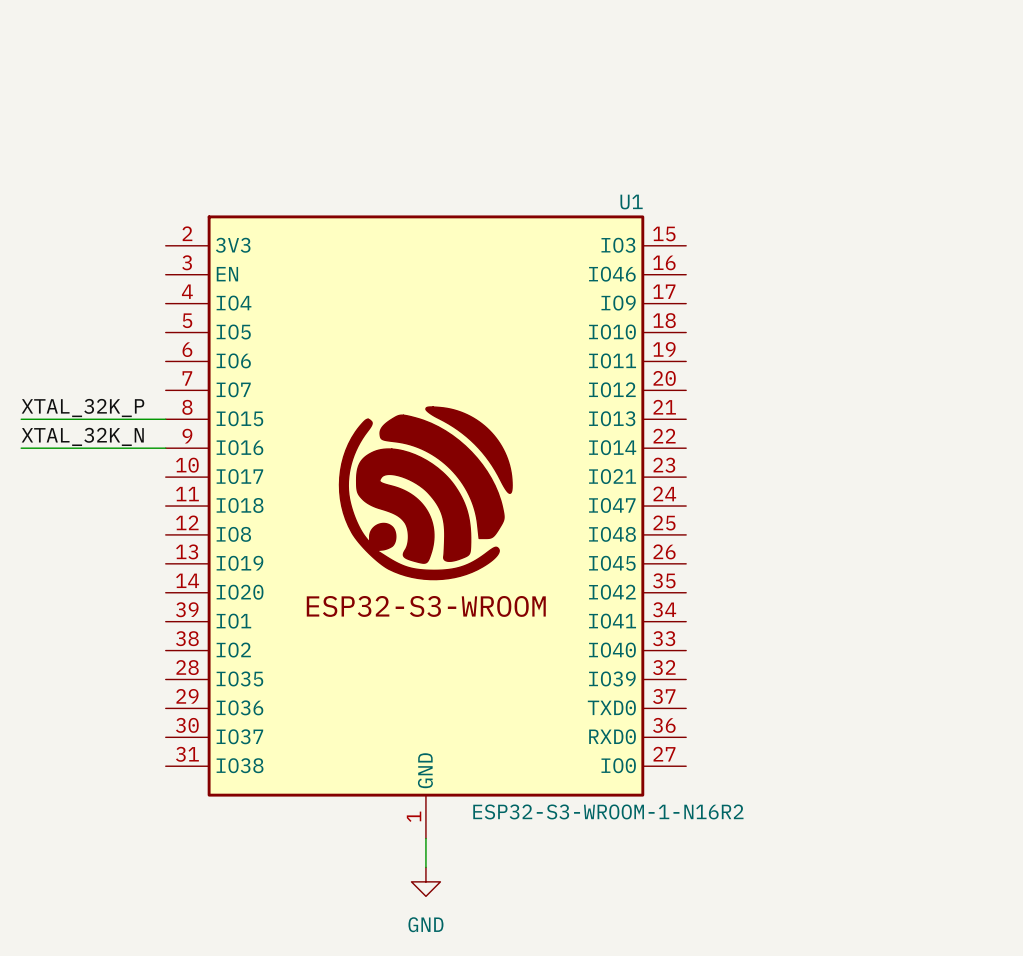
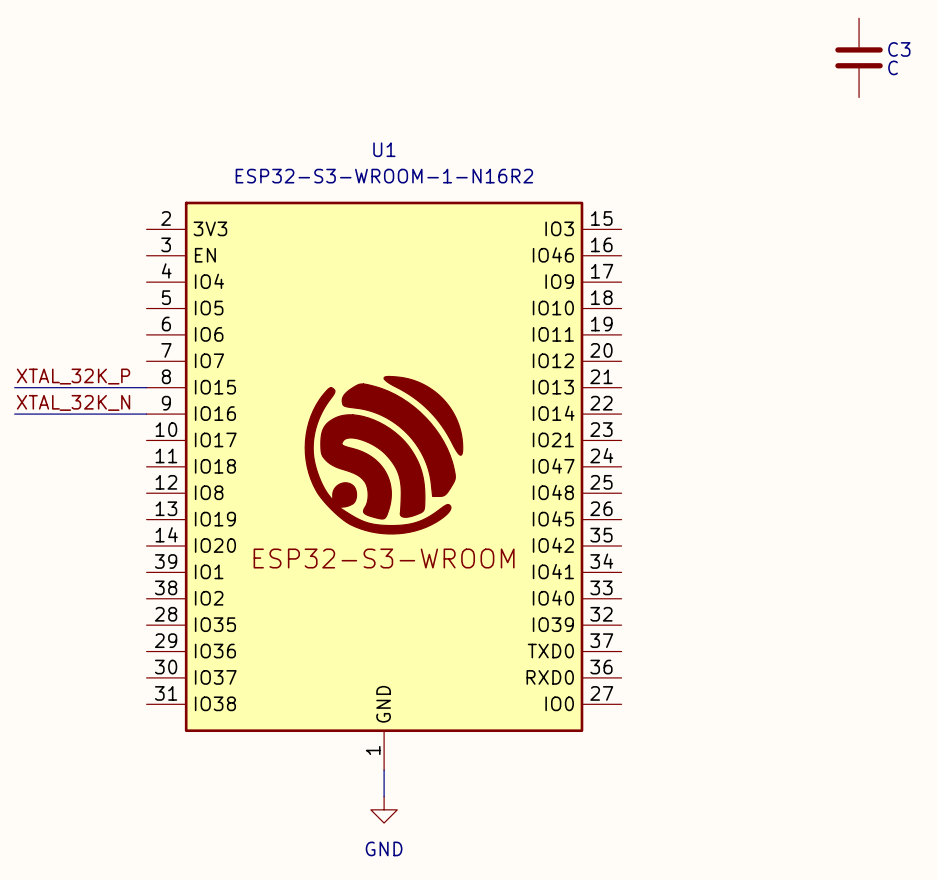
C3: none -> C (859, 57)
U1 name position: U1 (631, 202) -> U1 (384, 149)
U1 value position: ESP32-S3-WROOM-1-N16R2 (608, 811) -> ESP32-S3-WROOM-1-N16R2 (384, 176)

